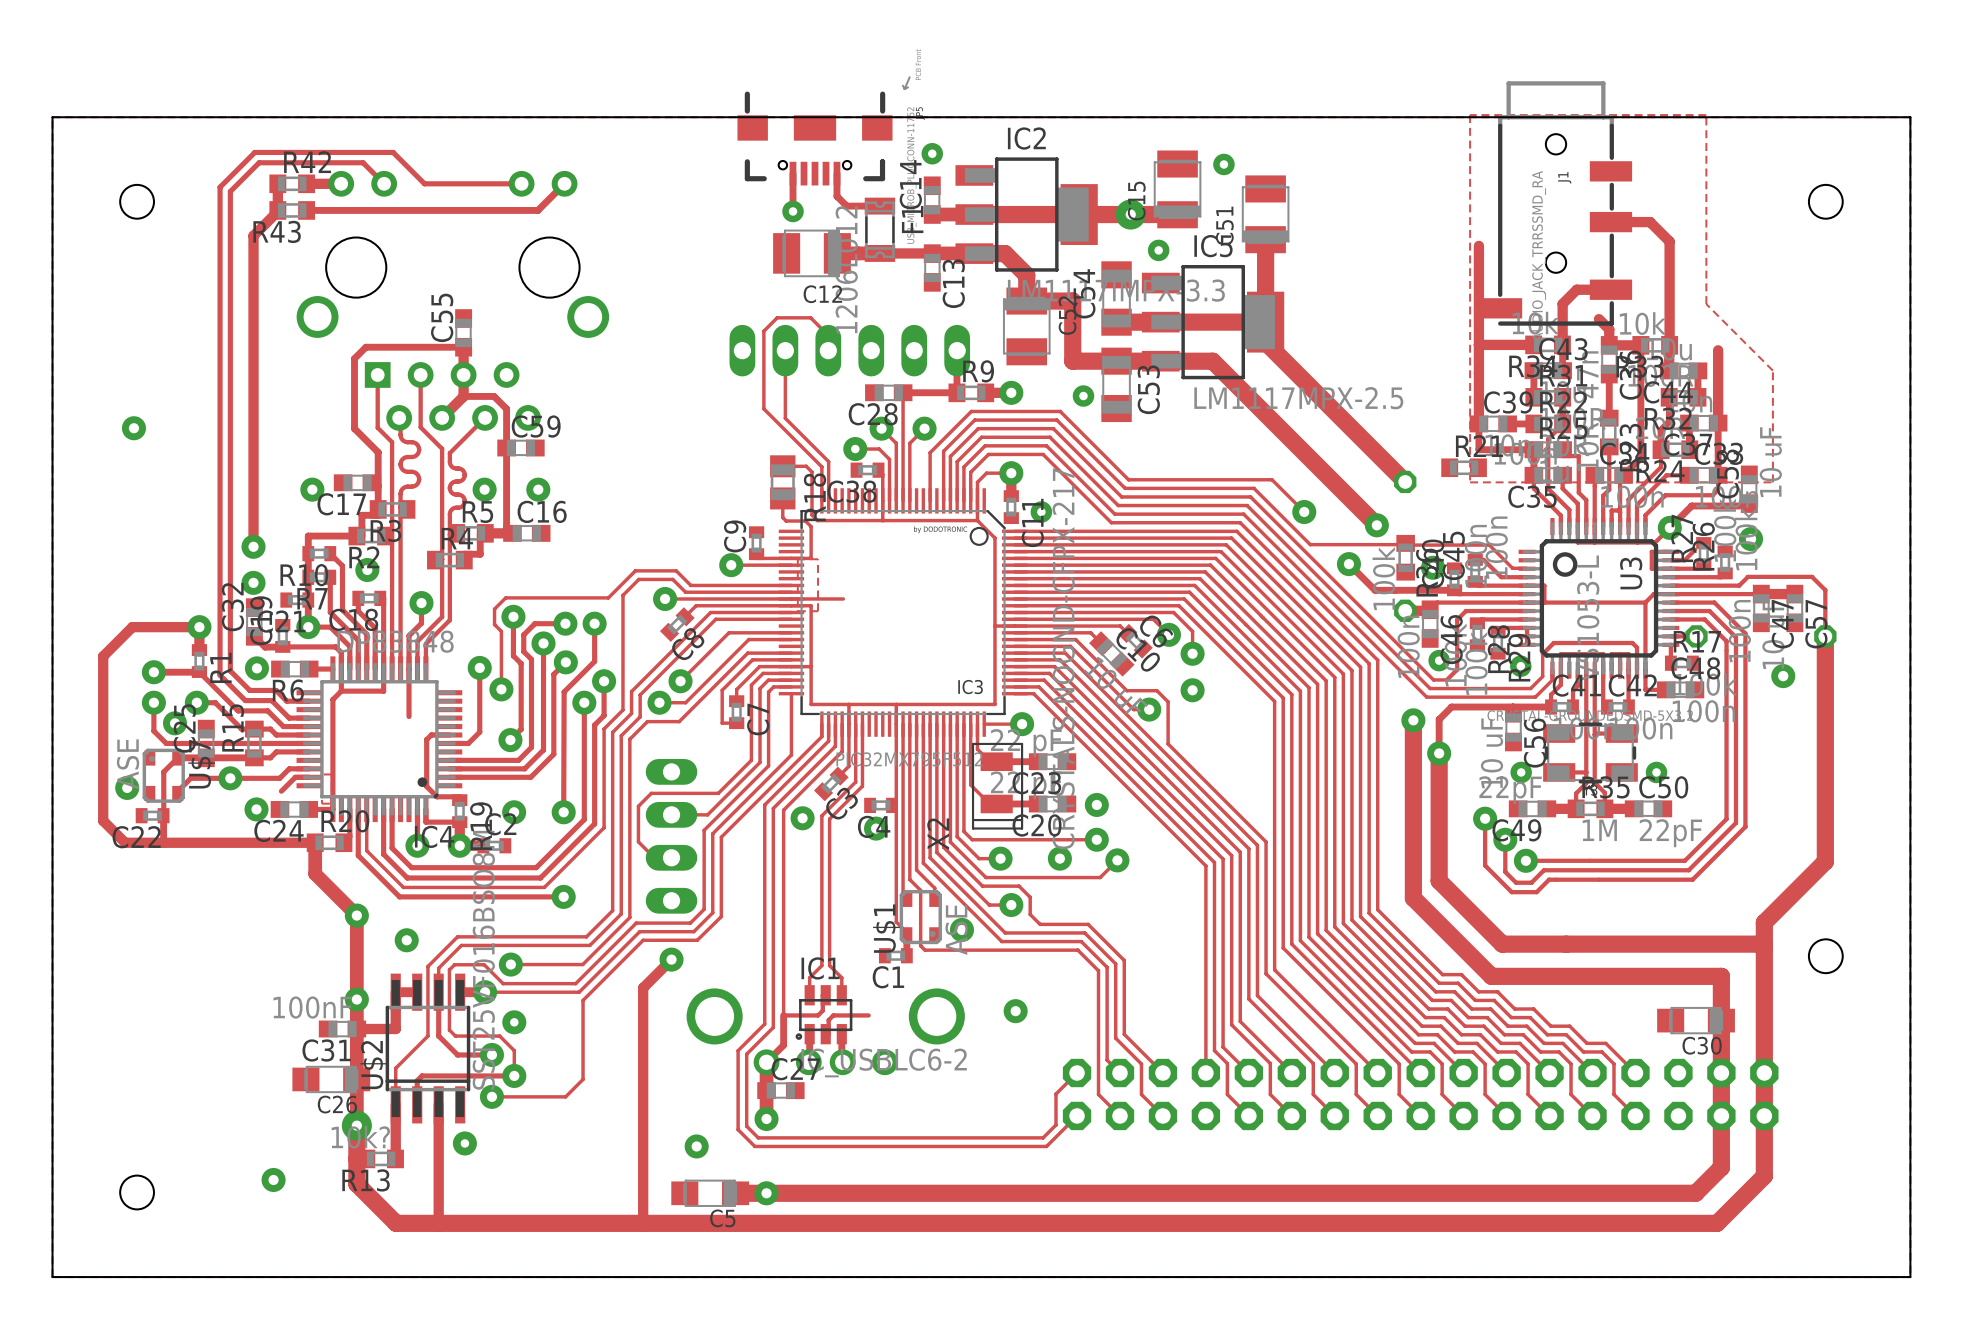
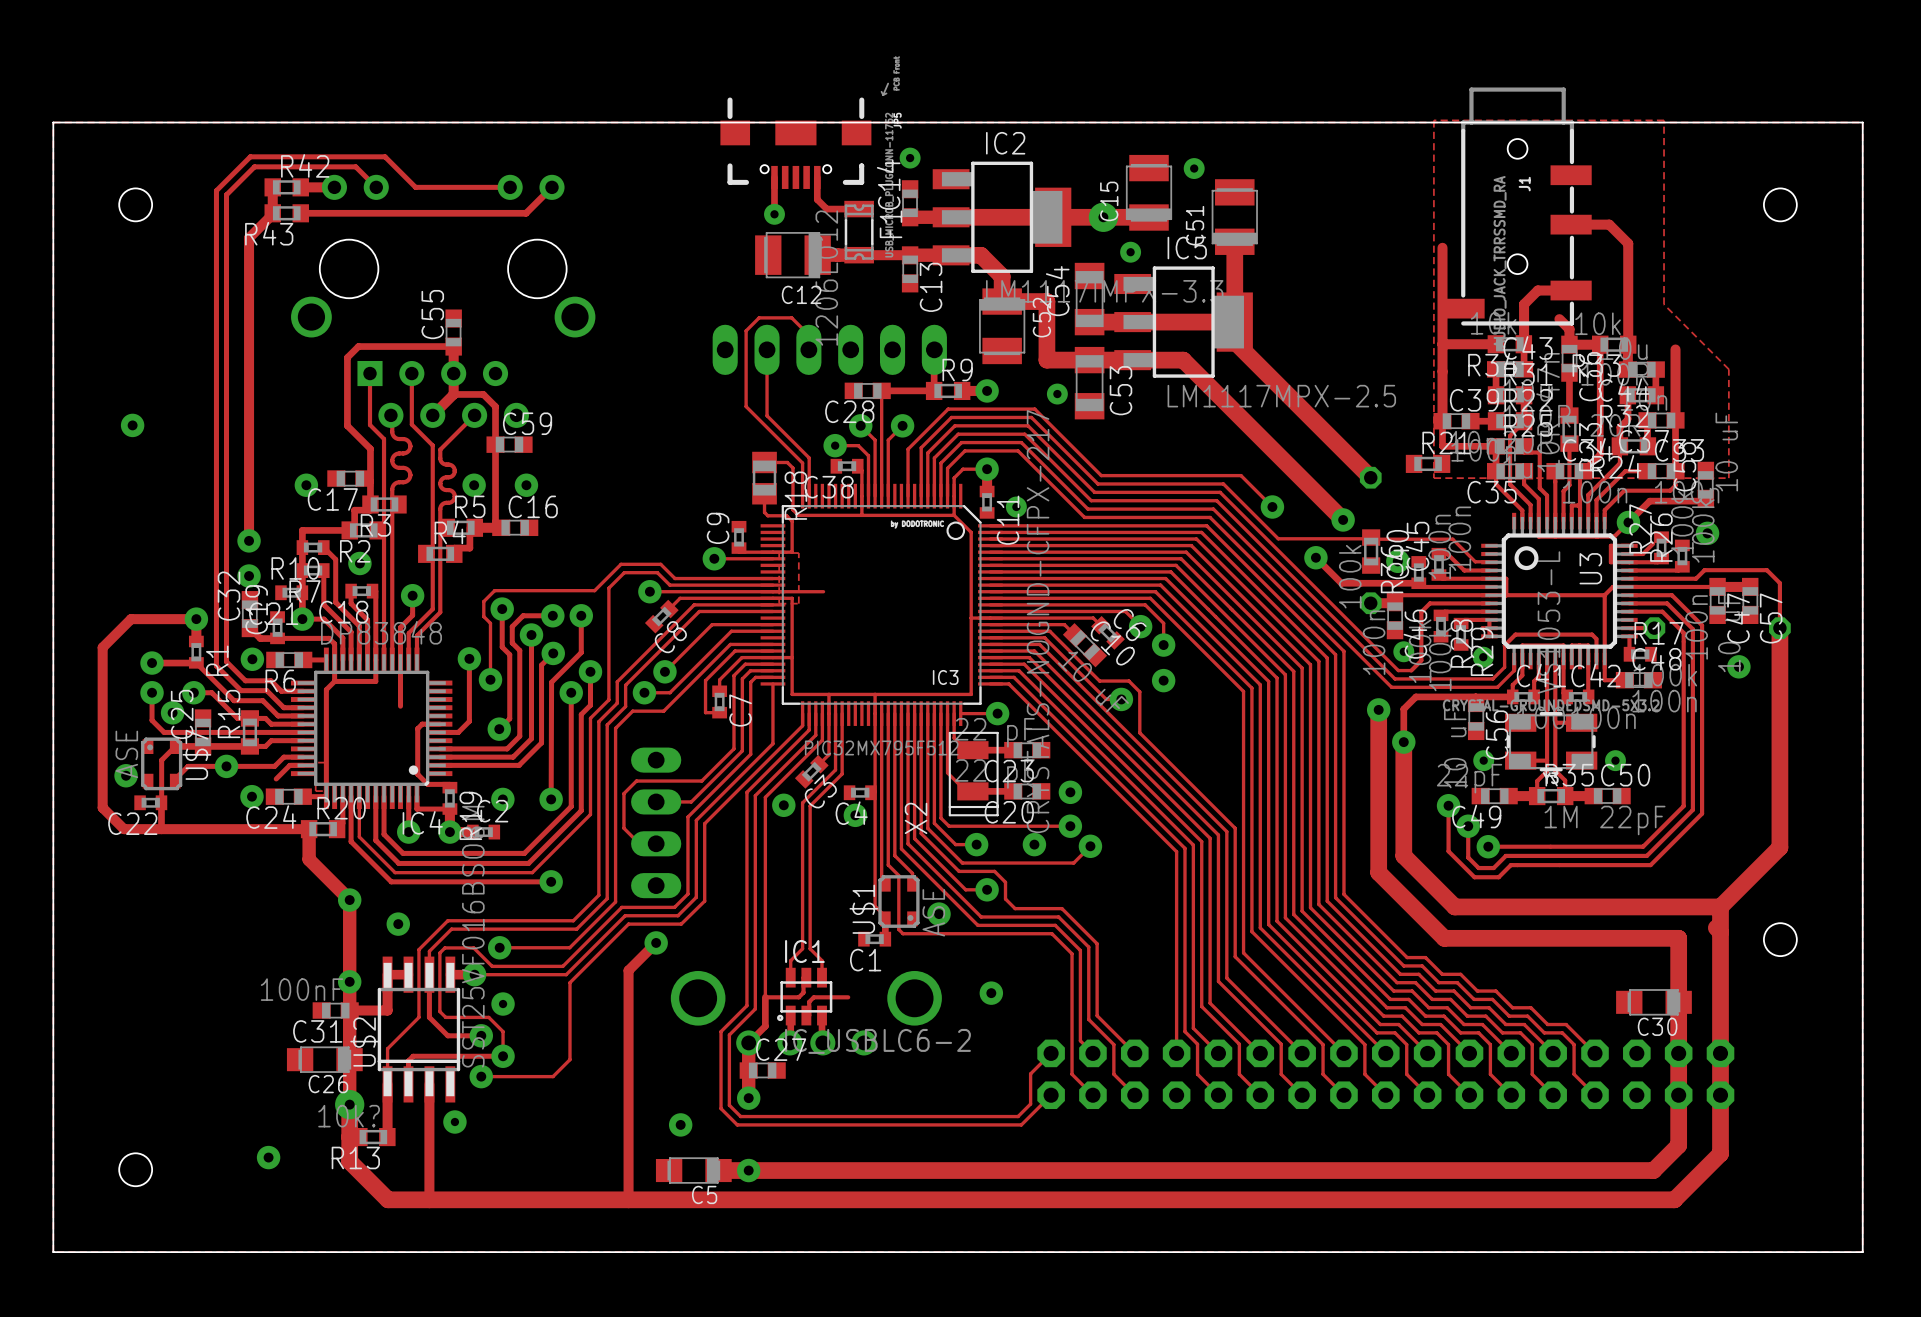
track: (1439, 870) (1439, 881) (1502, 944) (1764, 944) -> (1403, 855) (1454, 906) (1720, 906)
track: (1413, 887) (1413, 898) (1491, 976) (1721, 976) -> (1378, 872) (1444, 938) (1678, 938) (1678, 959)

